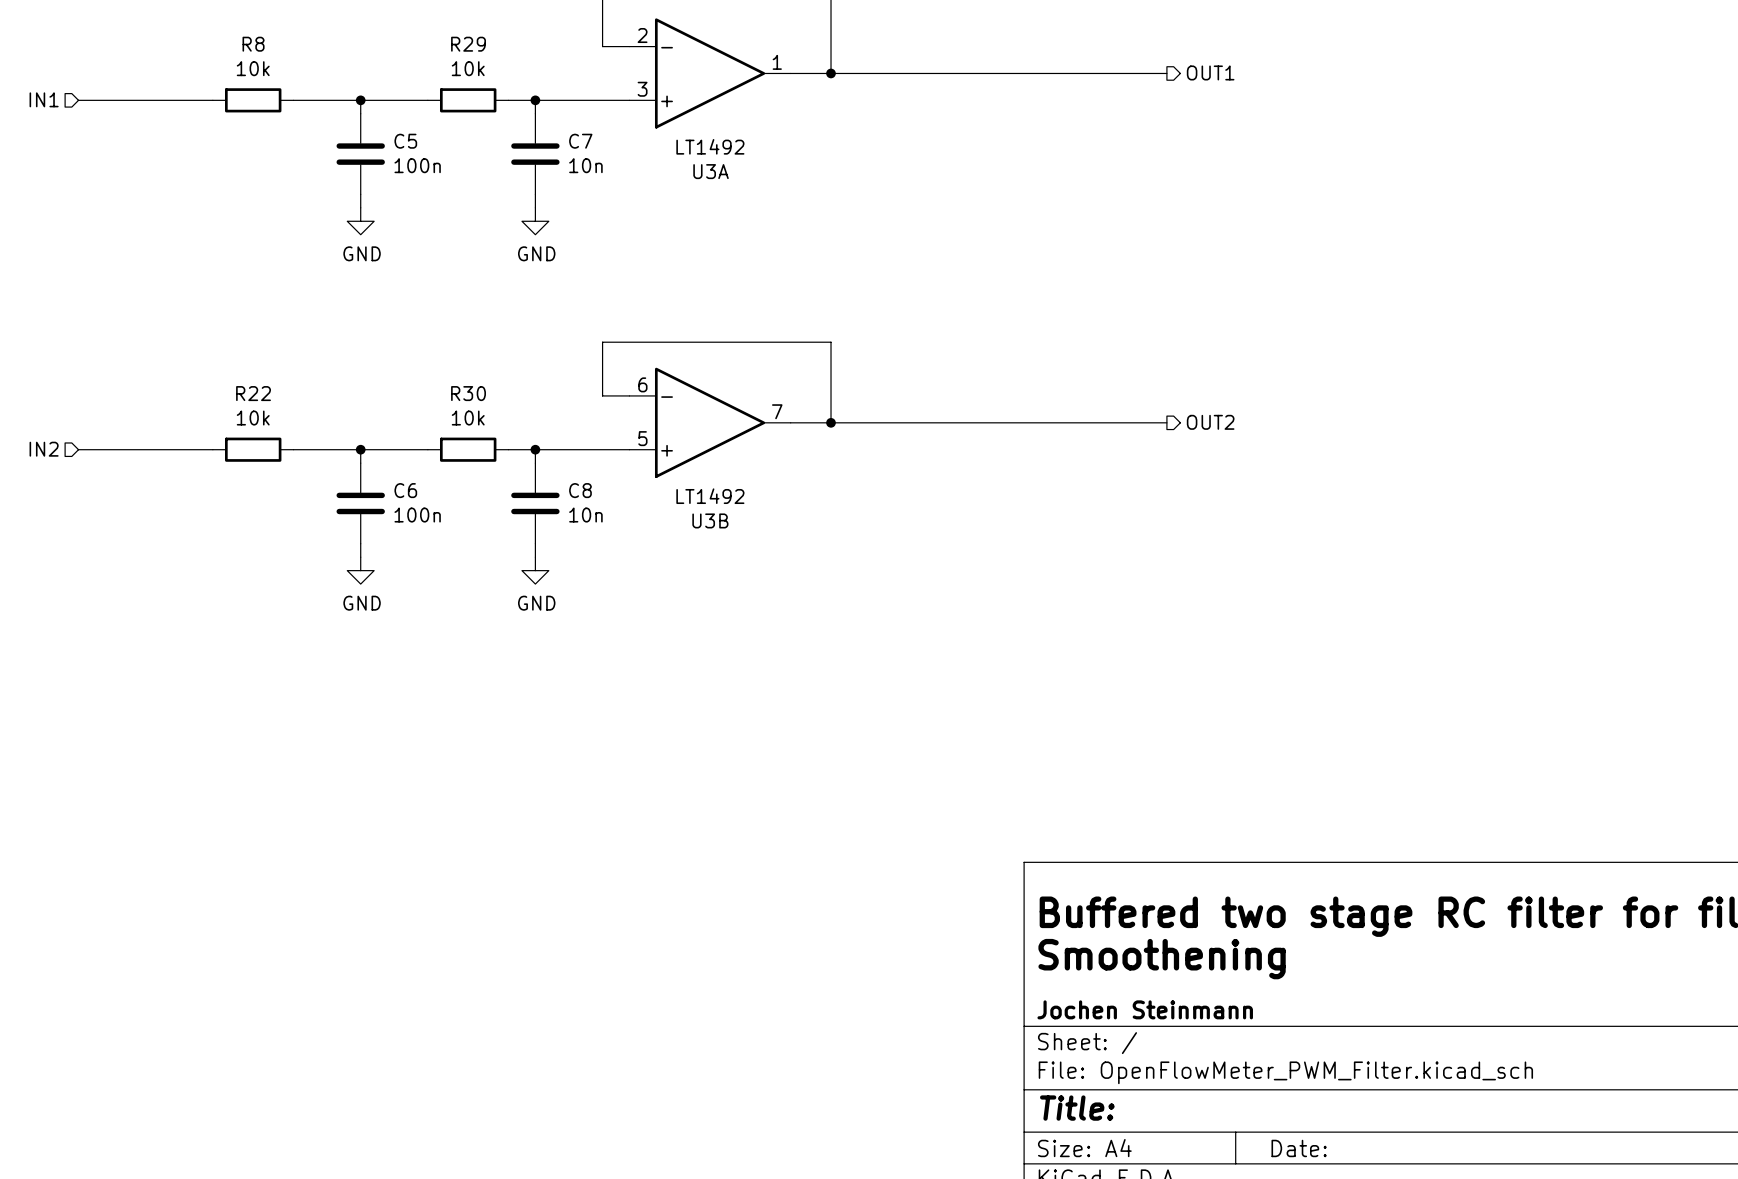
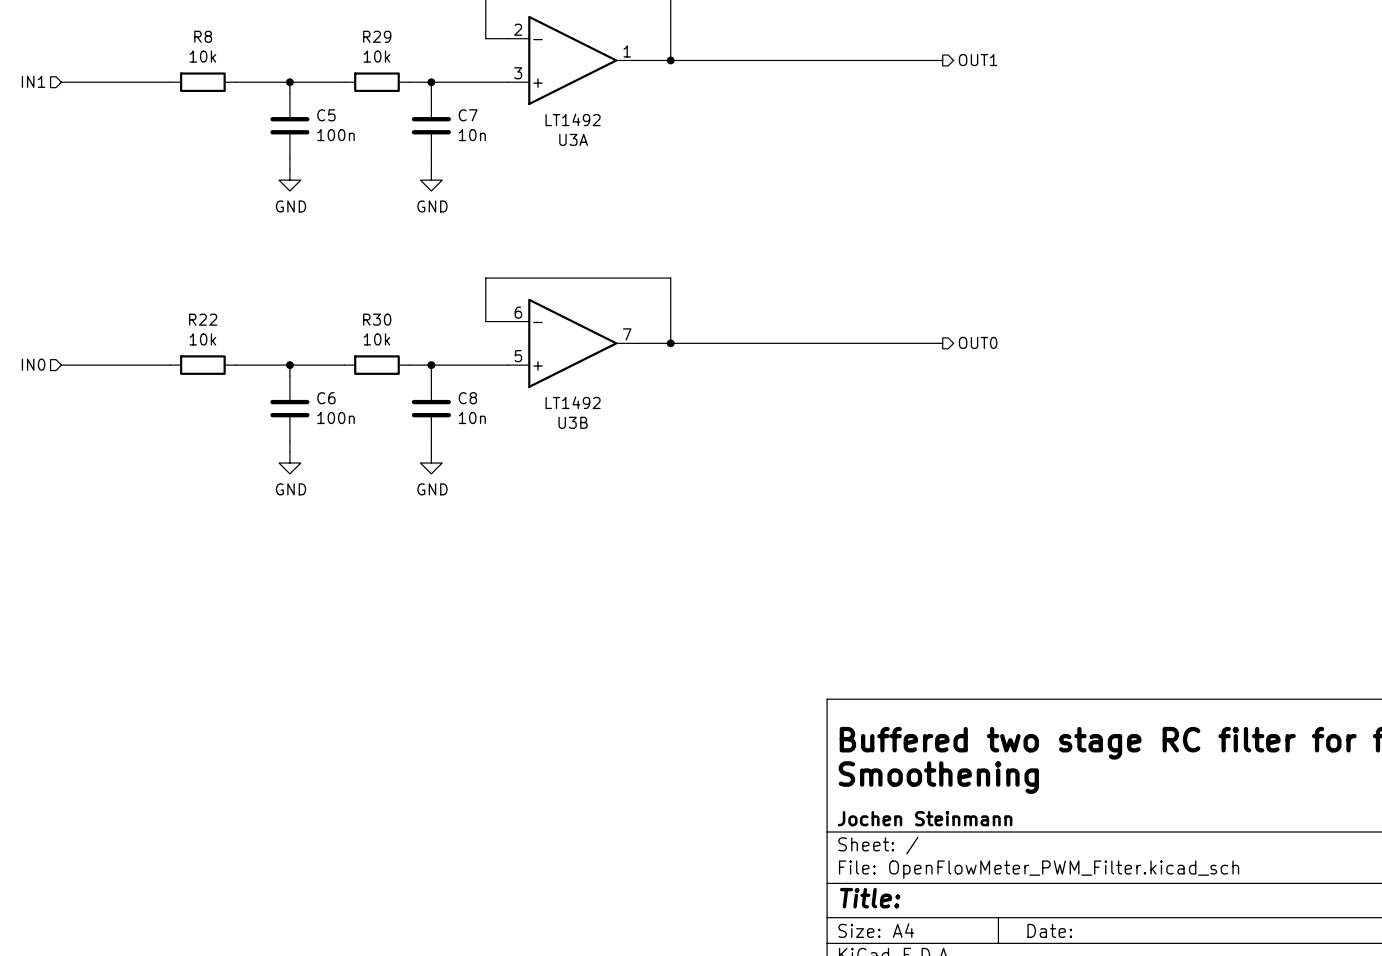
hierarchical label: OUT2 (1210, 422) -> OUT0 (978, 342)
hierarchical label: IN2 (44, 449) -> IN0 (33, 364)

